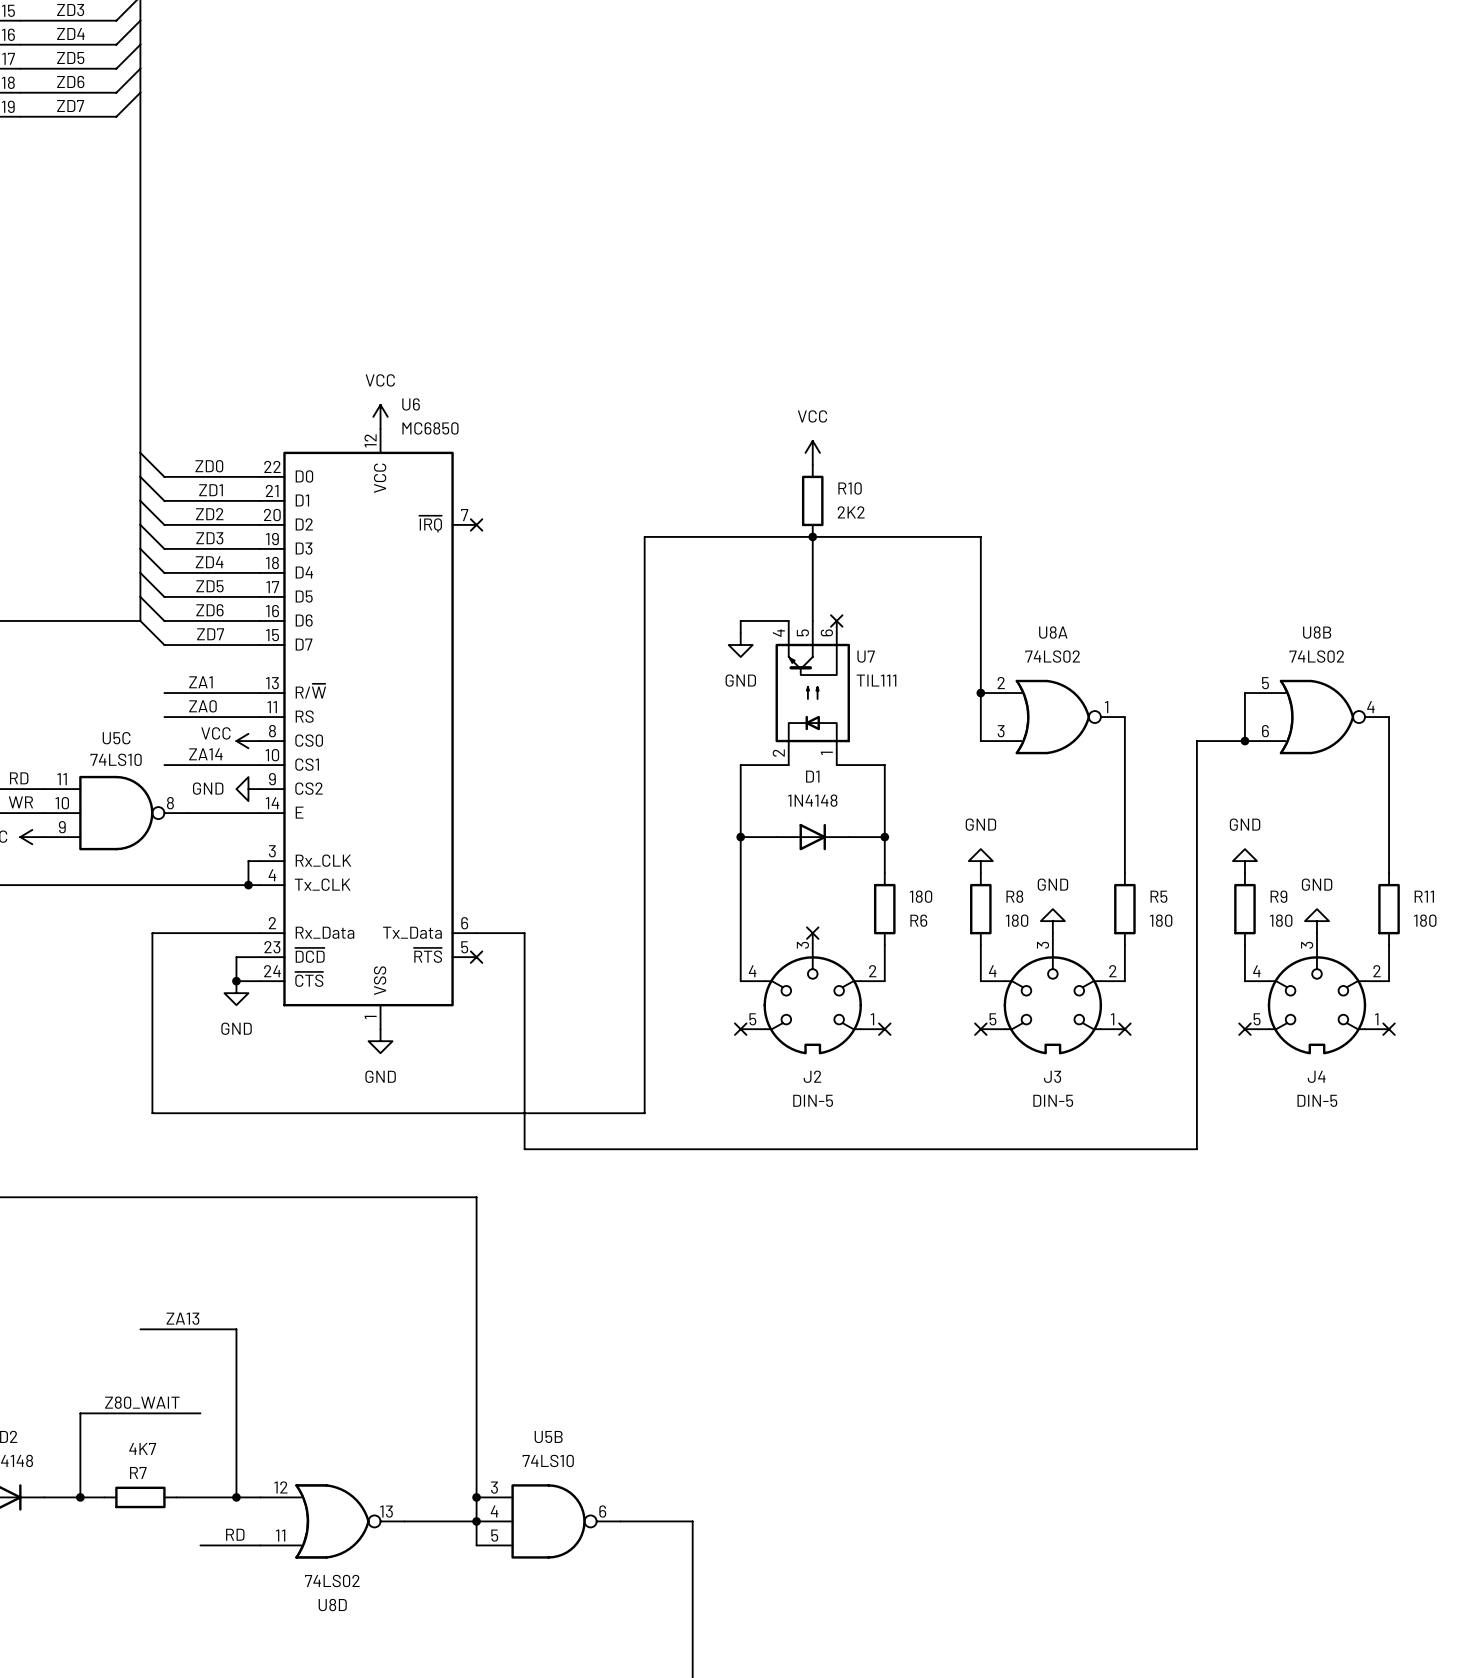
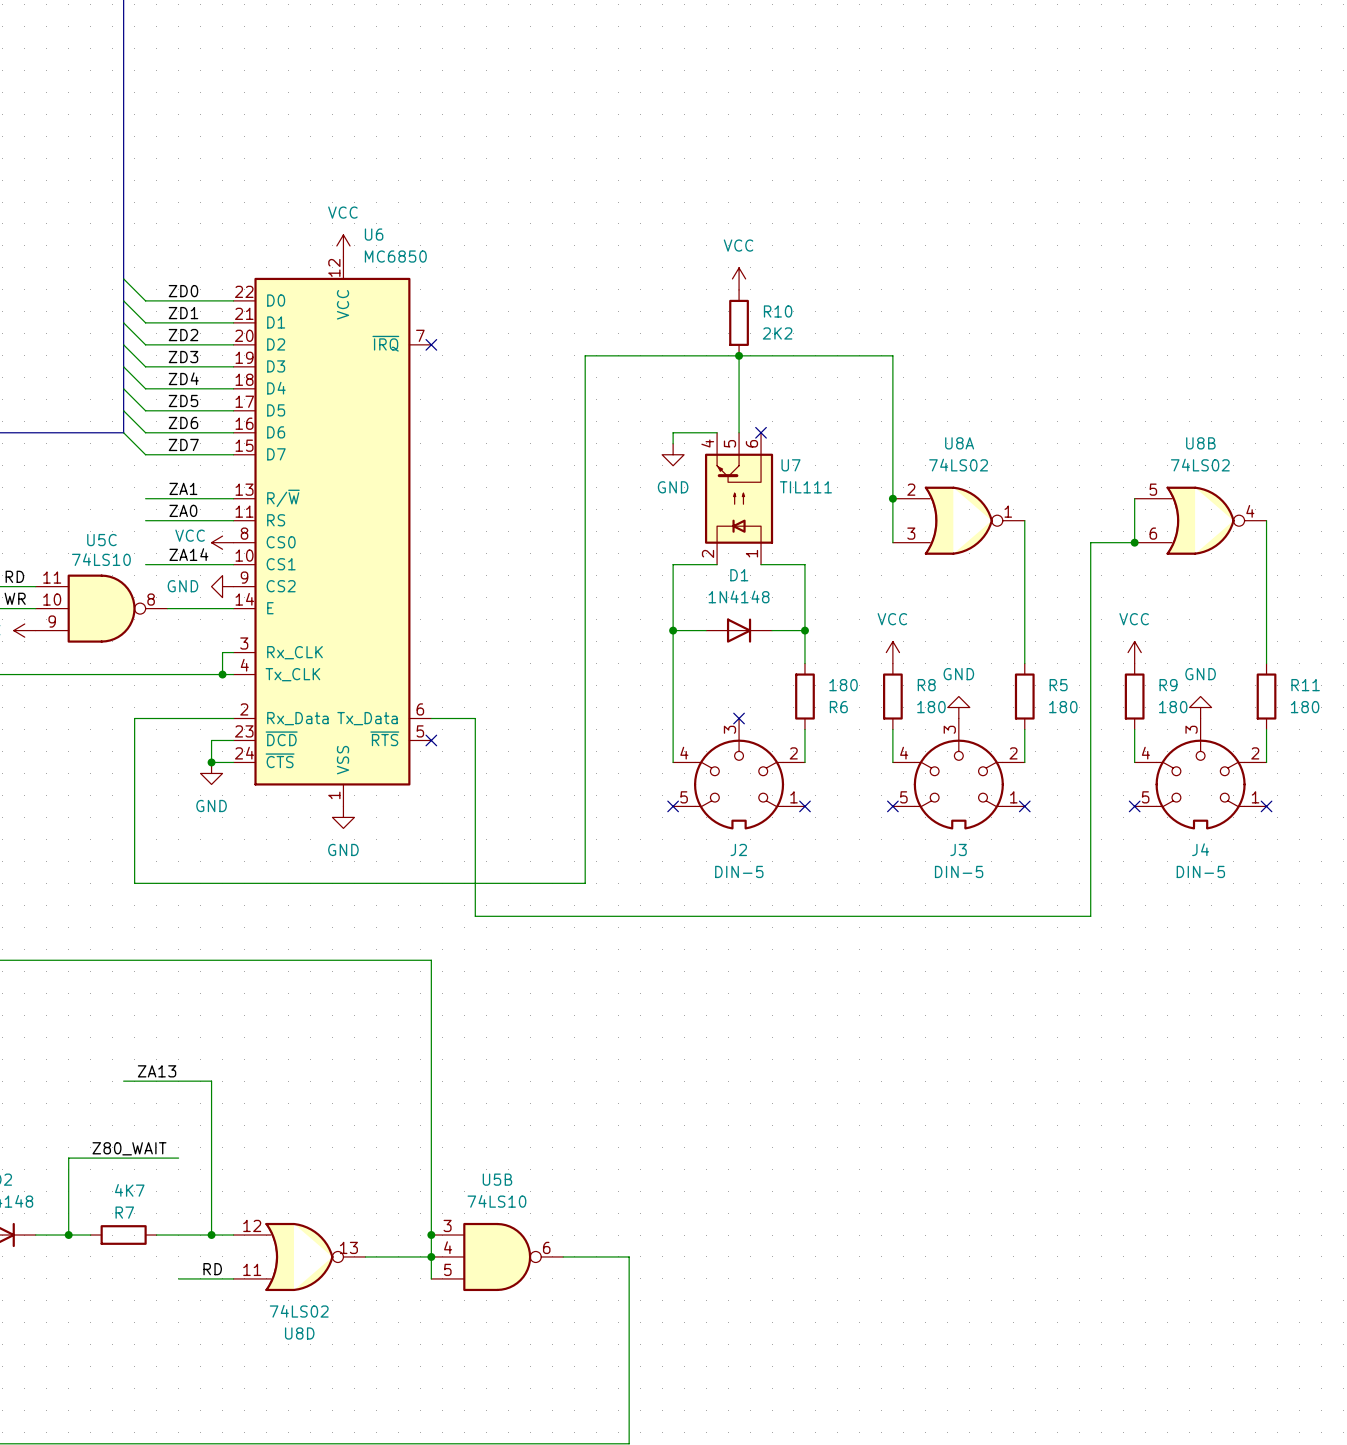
power symbol: GND (980, 861) -> VCC (892, 652)
power symbol: GND (1244, 861) -> VCC (1134, 652)

